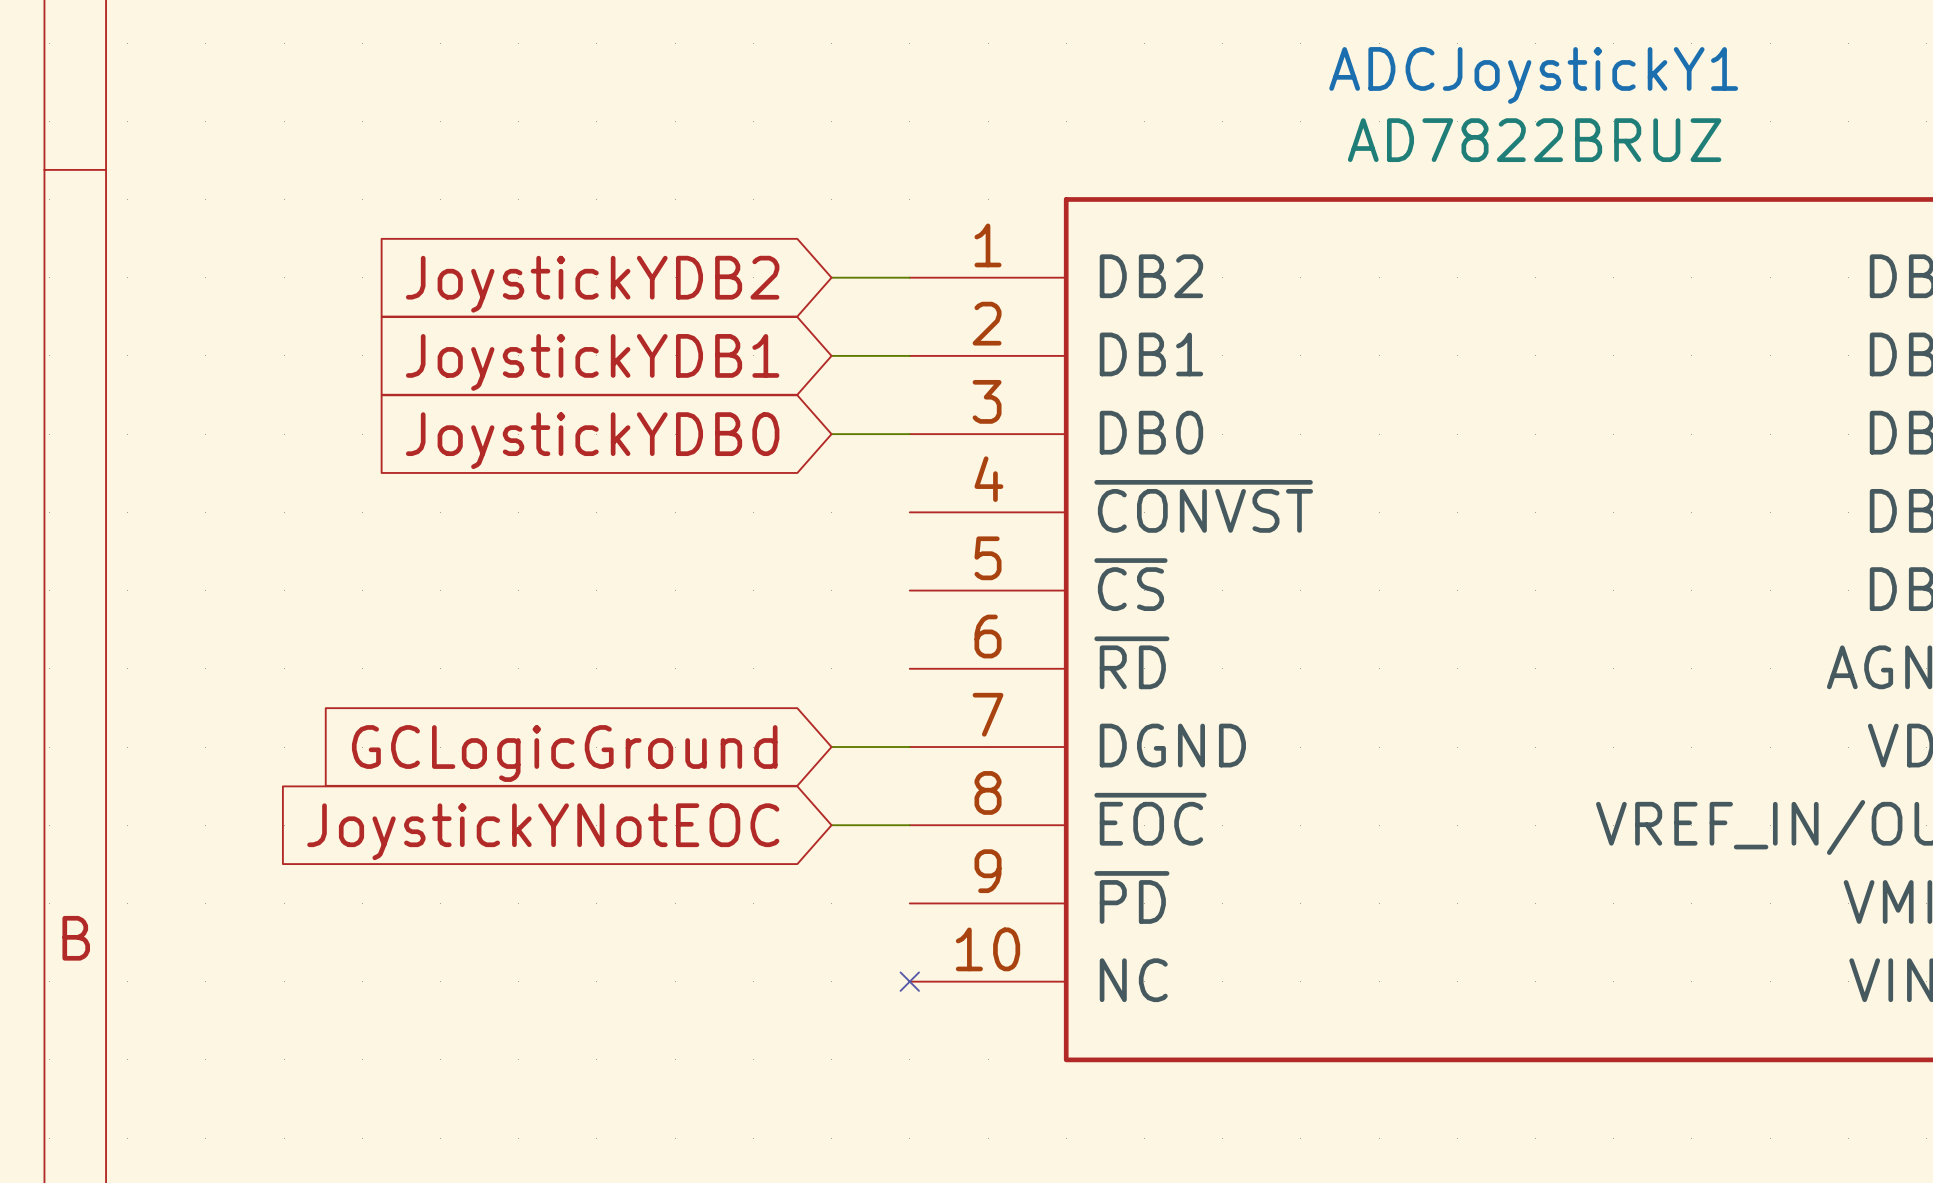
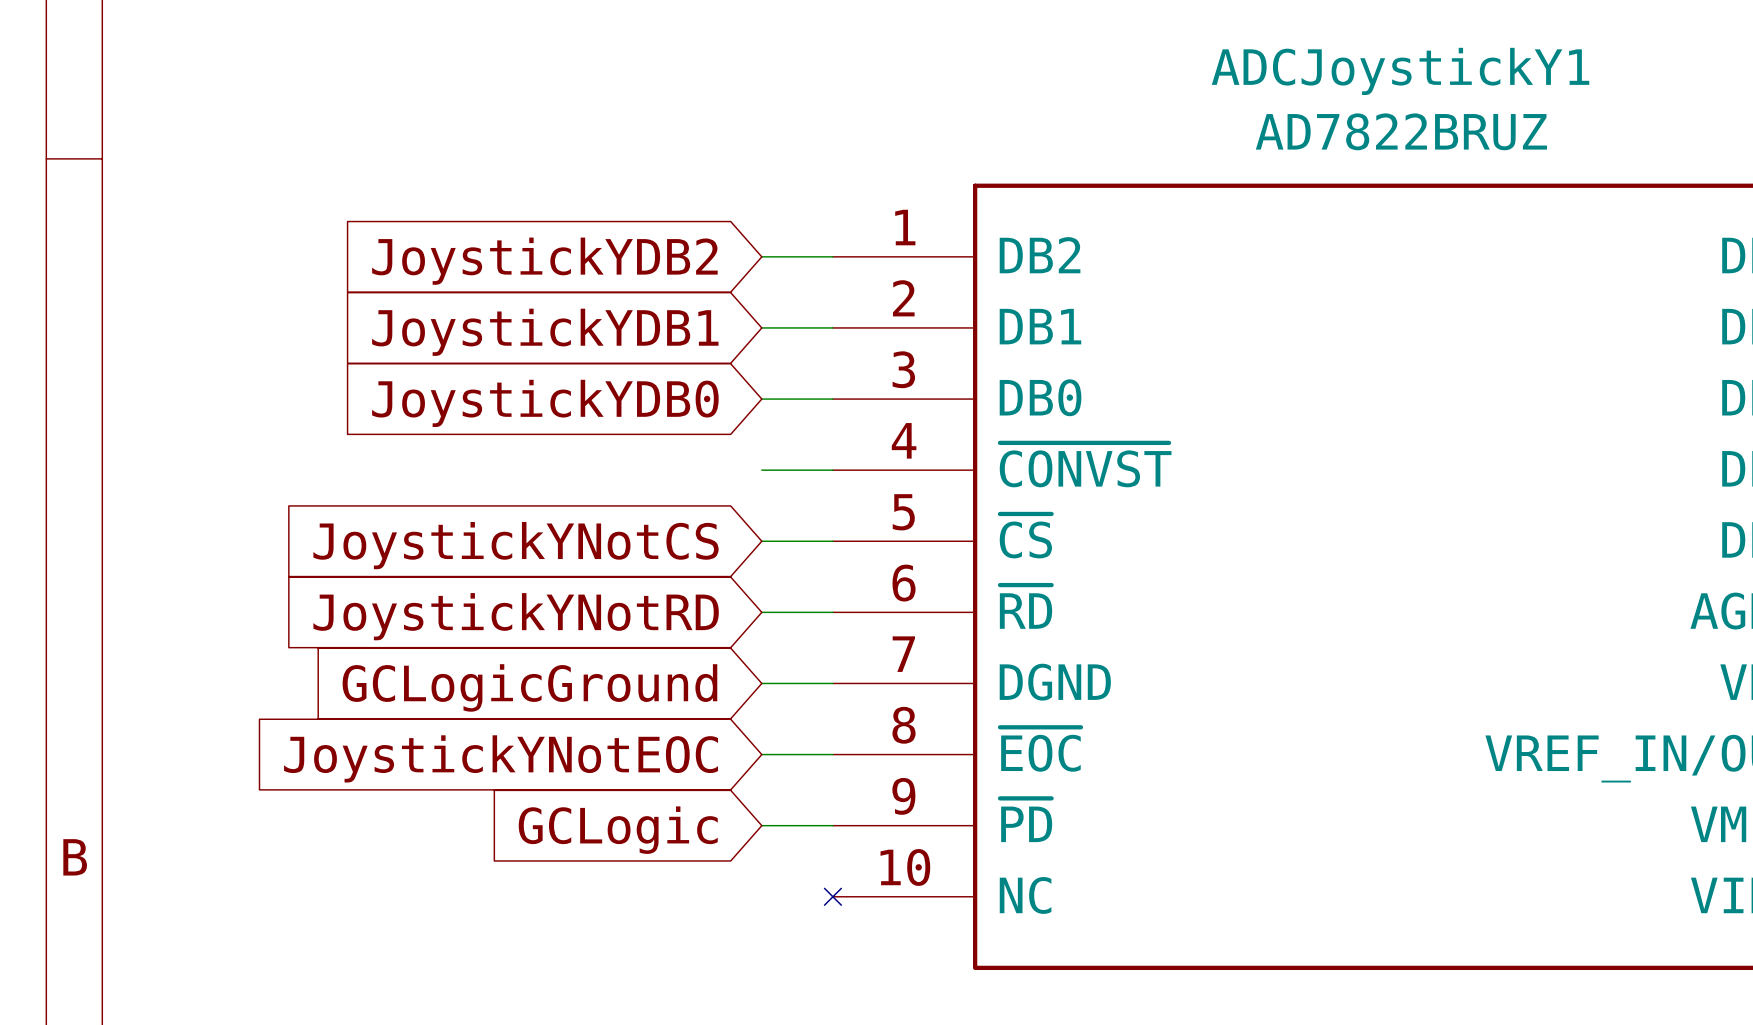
wire: none -> (761, 470) (832, 470)
wire: none -> (761, 541) (832, 541)
global label: none -> JoystickYNotCS (516, 545)
wire: none -> (761, 612) (832, 612)
global label: none -> JoystickYNotRD (516, 616)
wire: none -> (761, 825) (832, 825)
global label: none -> GCLogic (618, 830)

